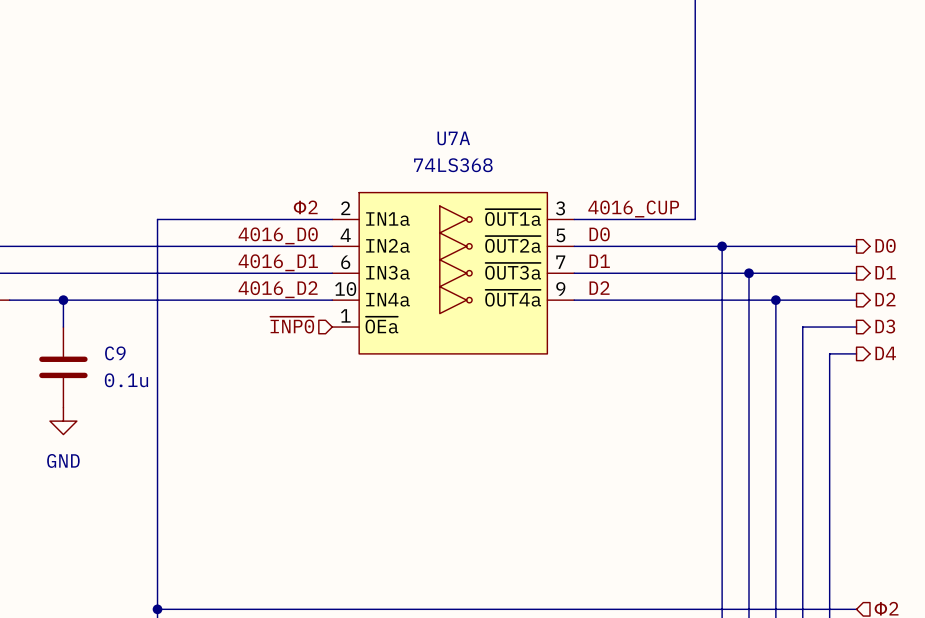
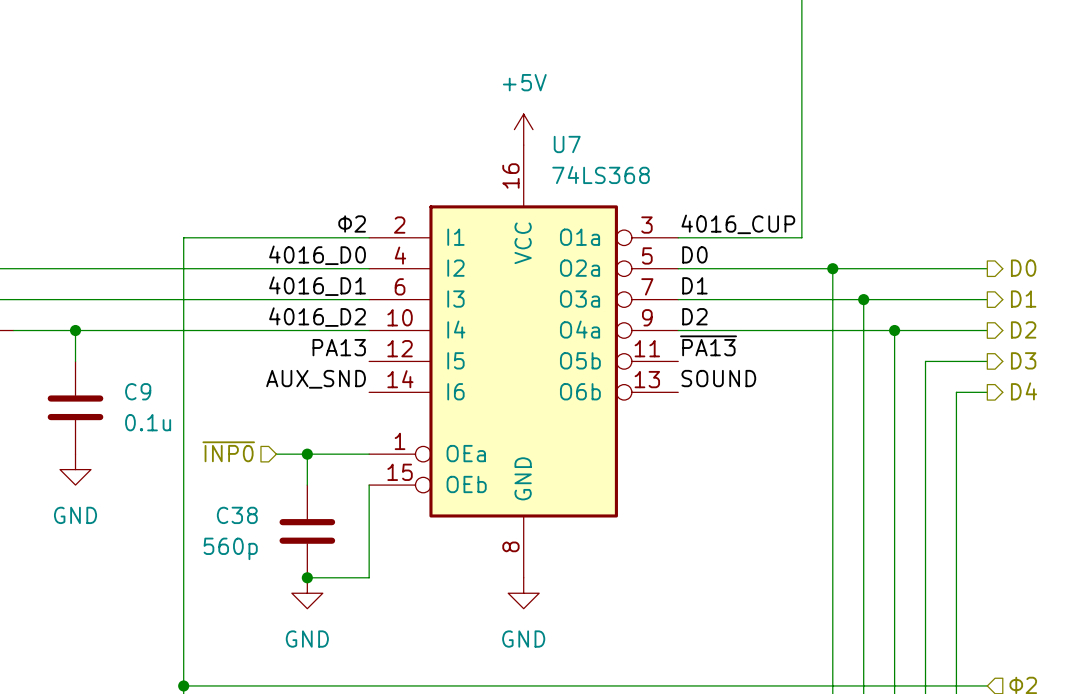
power symbol: none -> +5V (523, 129)
U7A: 74LS368 (453, 273) -> none
label: none -> ~{PA13} (708, 345)
label: none -> PA13 (339, 347)
hierarchical label position: ~{INP0} (292, 325) -> ~{INP0} (228, 451)
U7: none -> 74LS368 (523, 361)
label: none -> SOUND (718, 378)
label: none -> AUX_SND (316, 379)
wire: none -> (276, 454) (369, 454)
wire: none -> (307, 454) (307, 485)
junction: none -> (307, 454)
wire: none -> (369, 485) (369, 577) (307, 577)
C38: none -> 560p (307, 531)
junction: none -> (307, 577)
power symbol: none -> GND (307, 593)
power symbol: none -> GND (523, 593)

